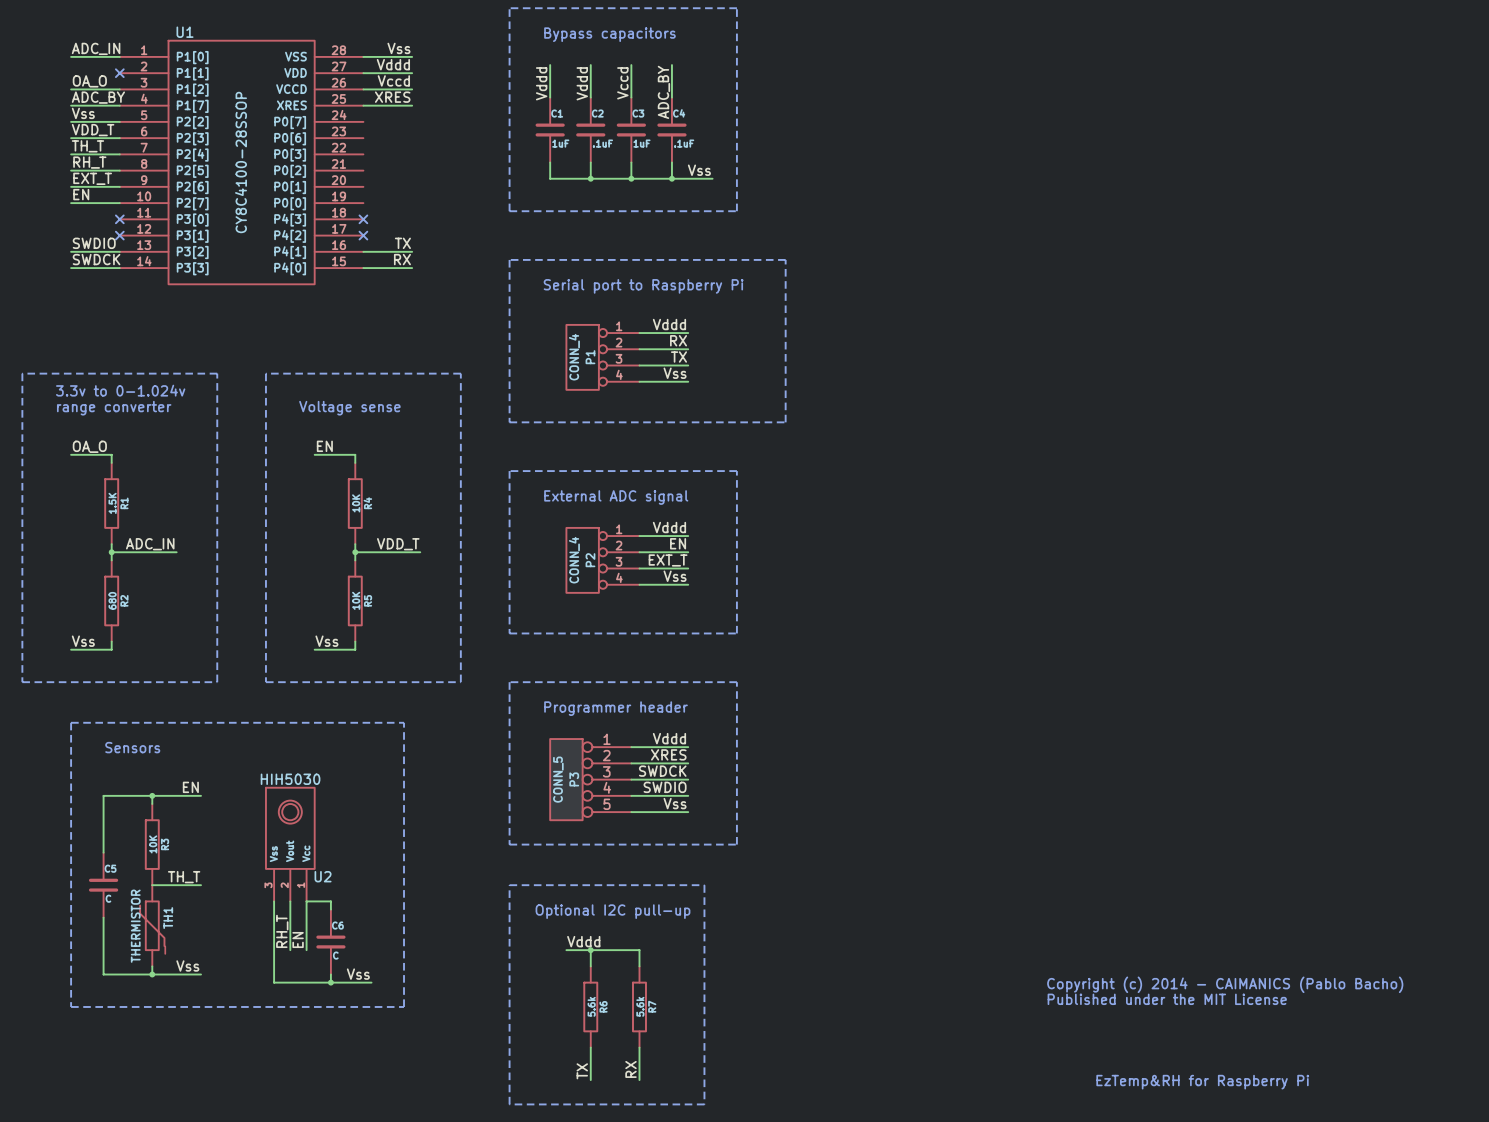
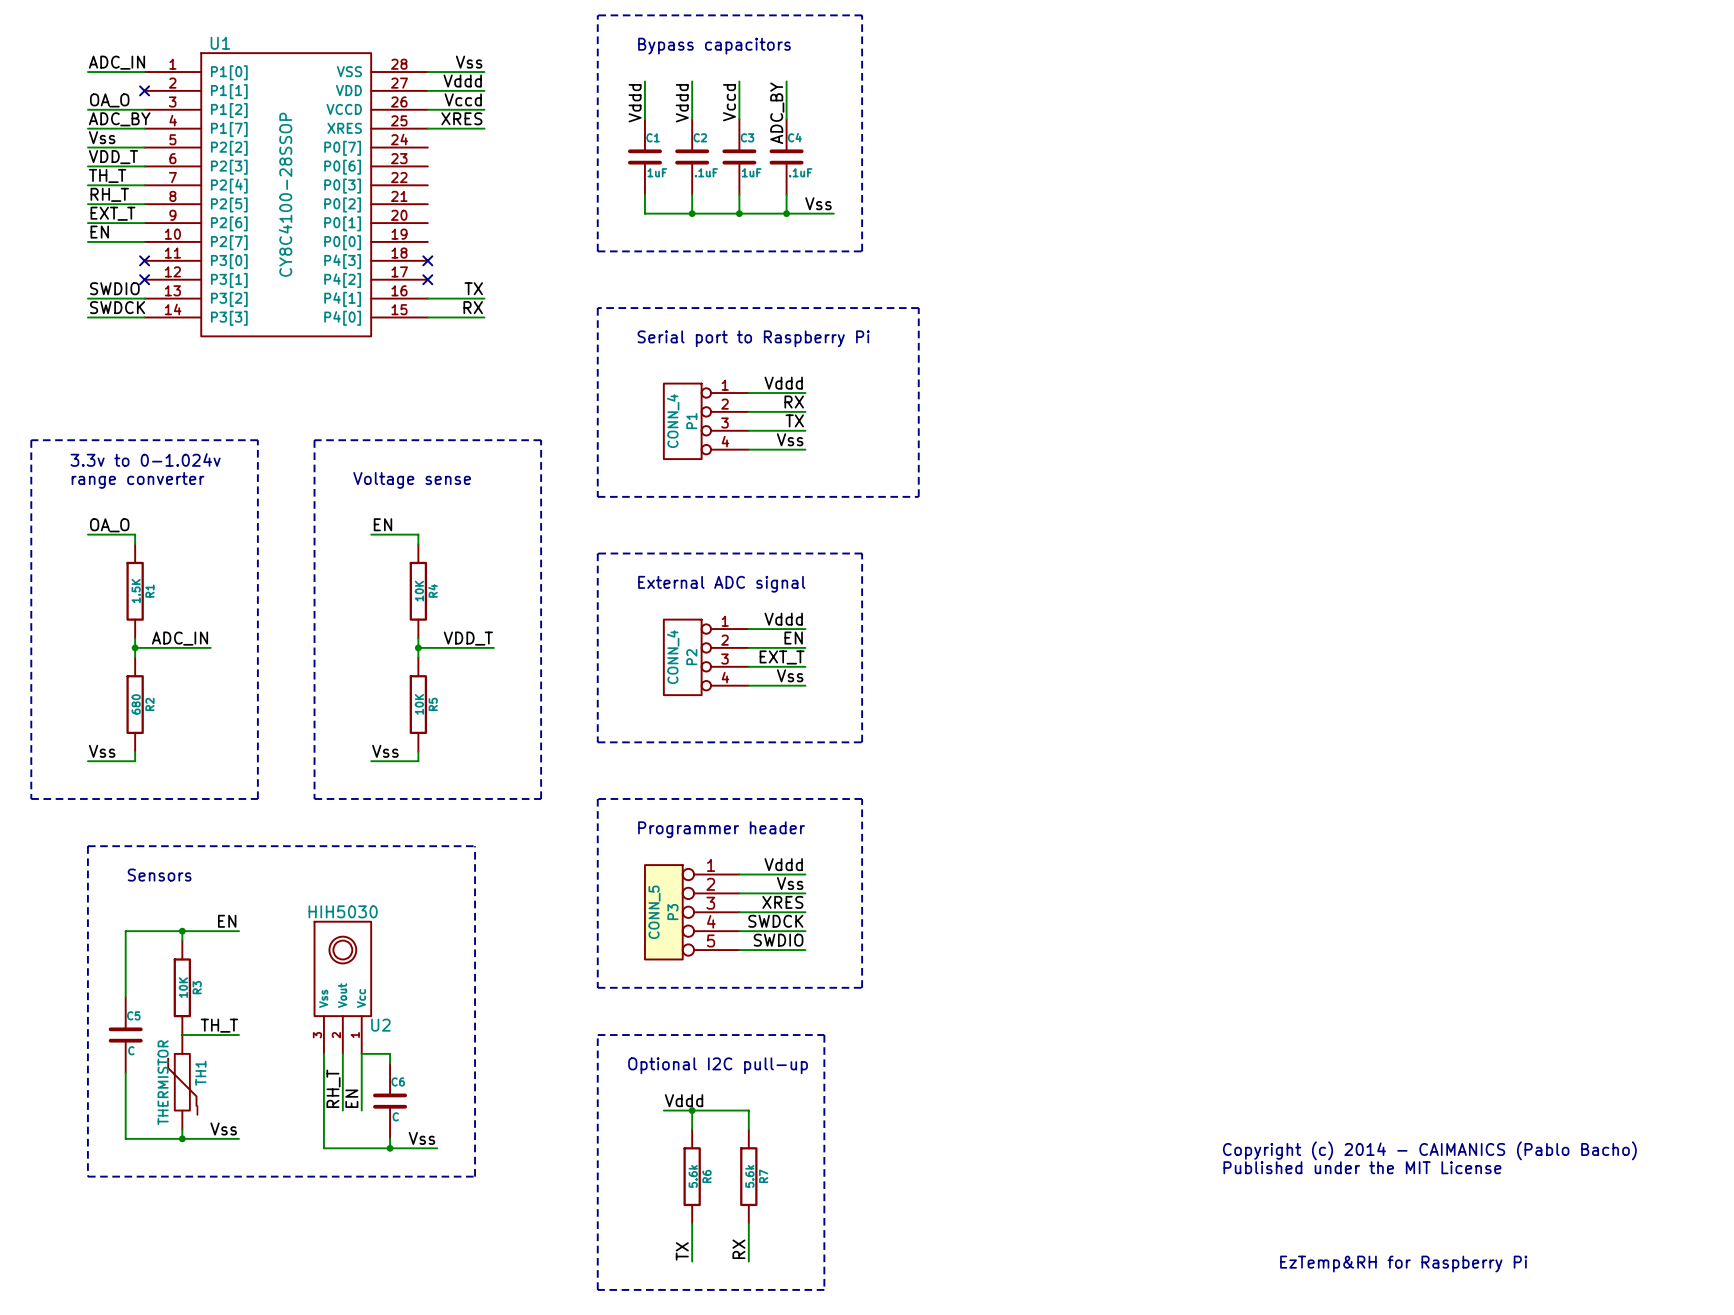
label: XRES (668, 754) -> Vss (790, 883)
label: SWDCK (662, 771) -> XRES (782, 902)
label: SWDIO (665, 787) -> SWDCK (775, 921)
label: Vss (675, 803) -> SWDIO (778, 940)

